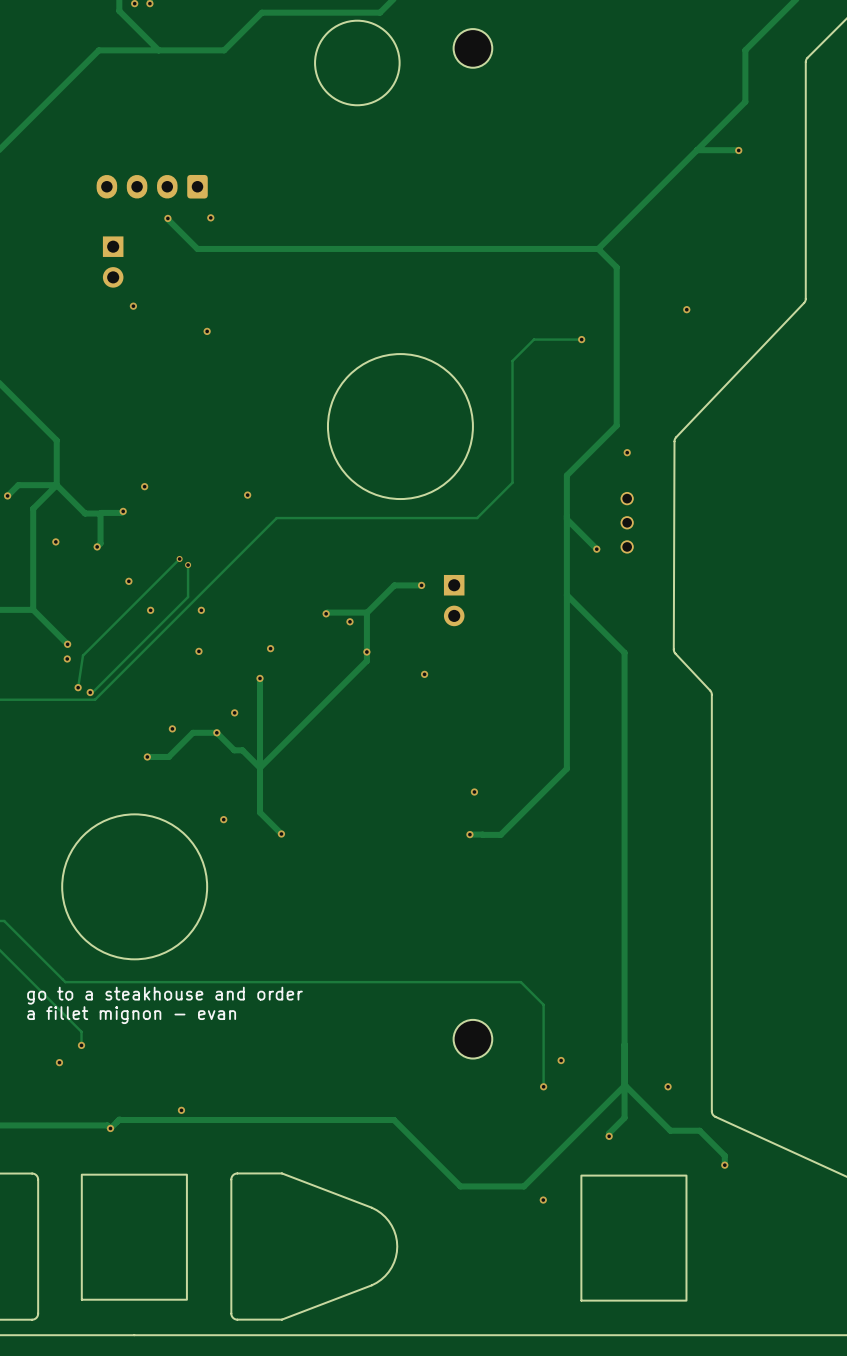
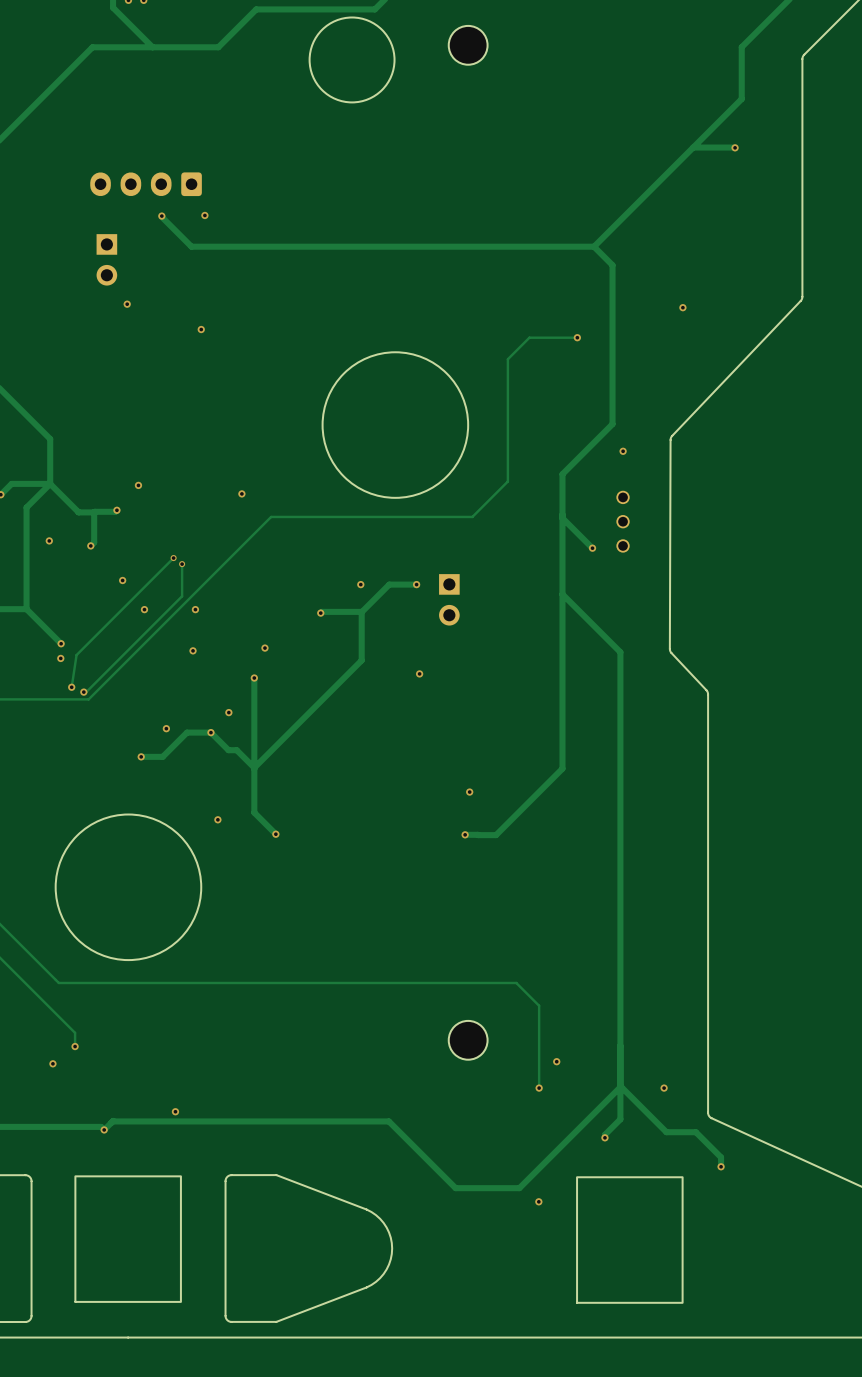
via: none -> (360, 584)
via: (349, 621) -> none
via: (366, 652) -> none
text: go to a steakhouse and order (165, 995) -> none
text: a fillet mignon - evan (131, 1015) -> none

